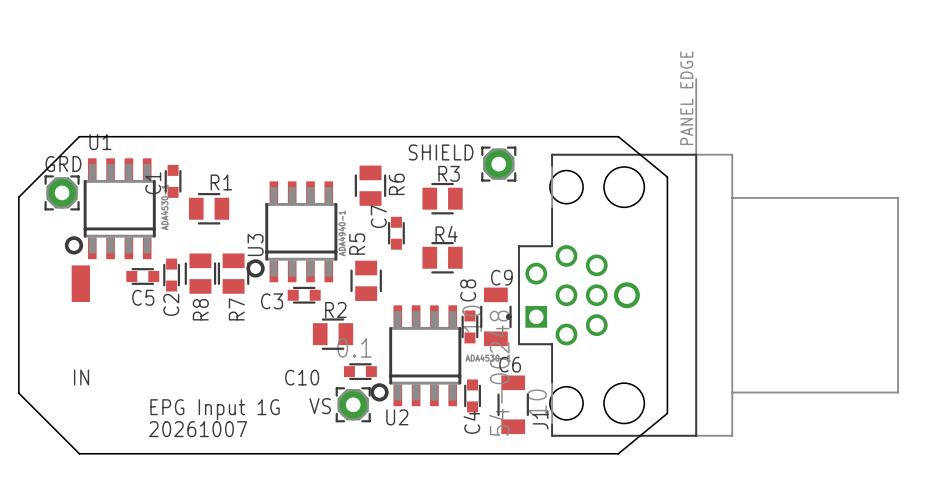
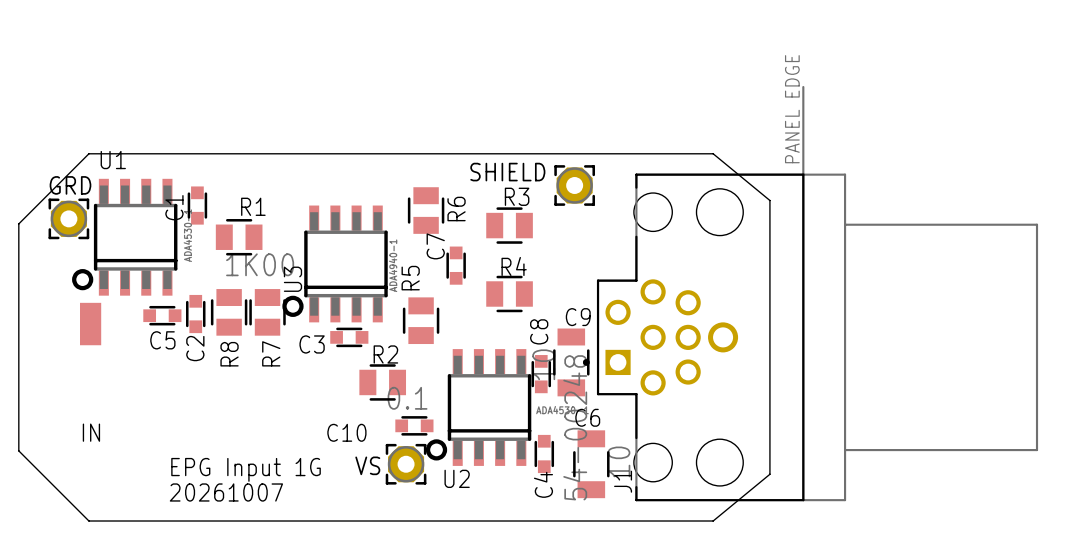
R1 value: none -> 1K00 (260, 264)

